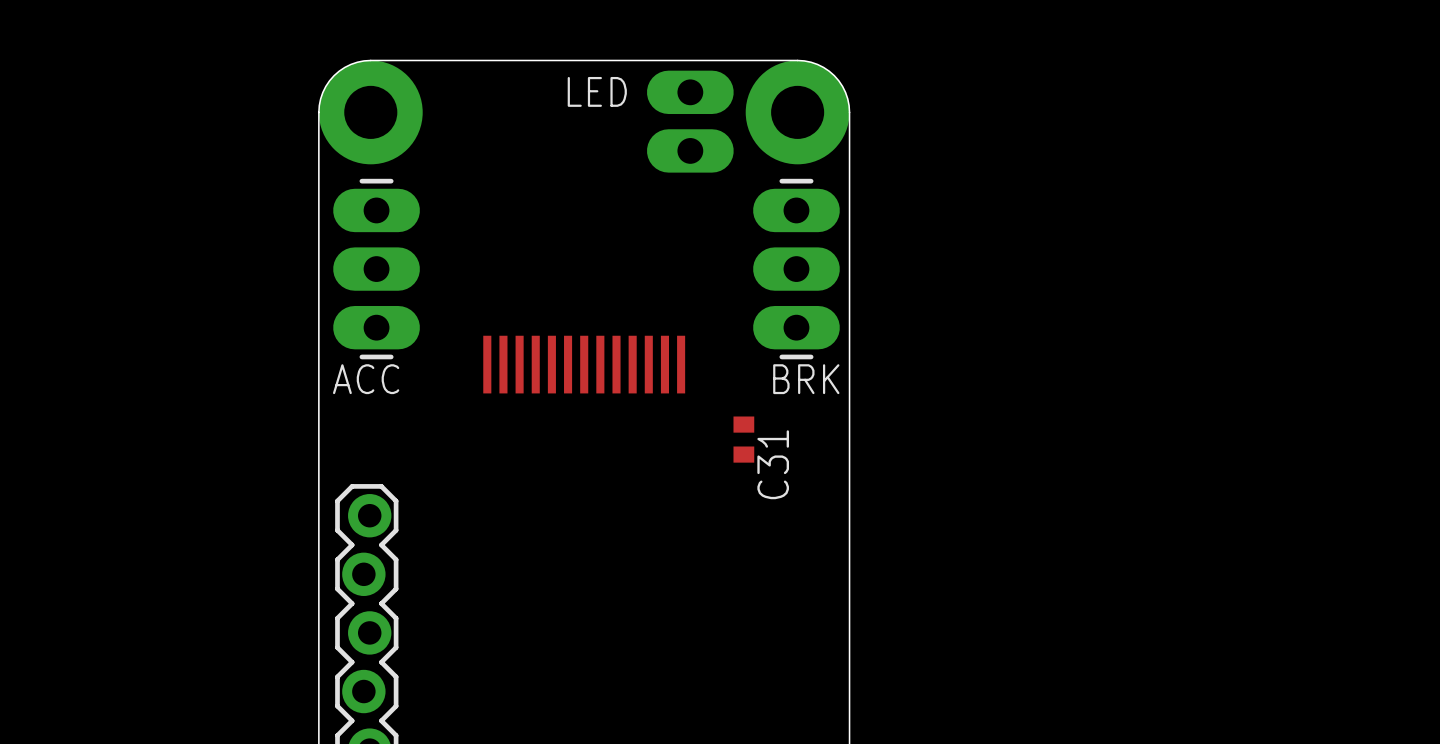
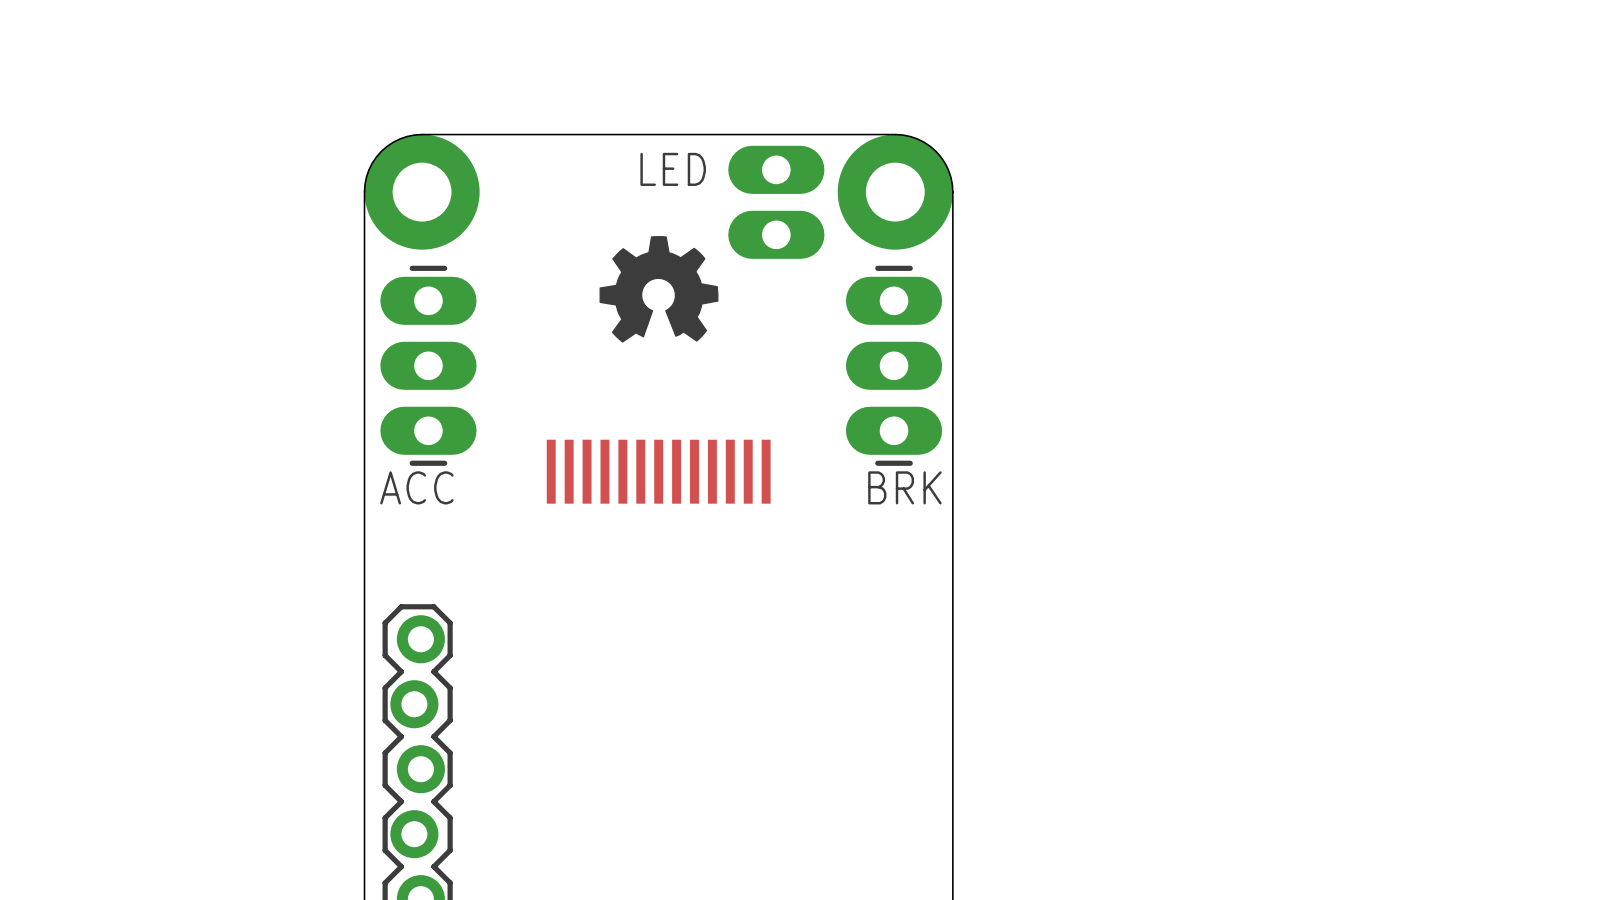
drawing: none -> [599, 236, 719, 343]
C31: (743, 439) -> none

